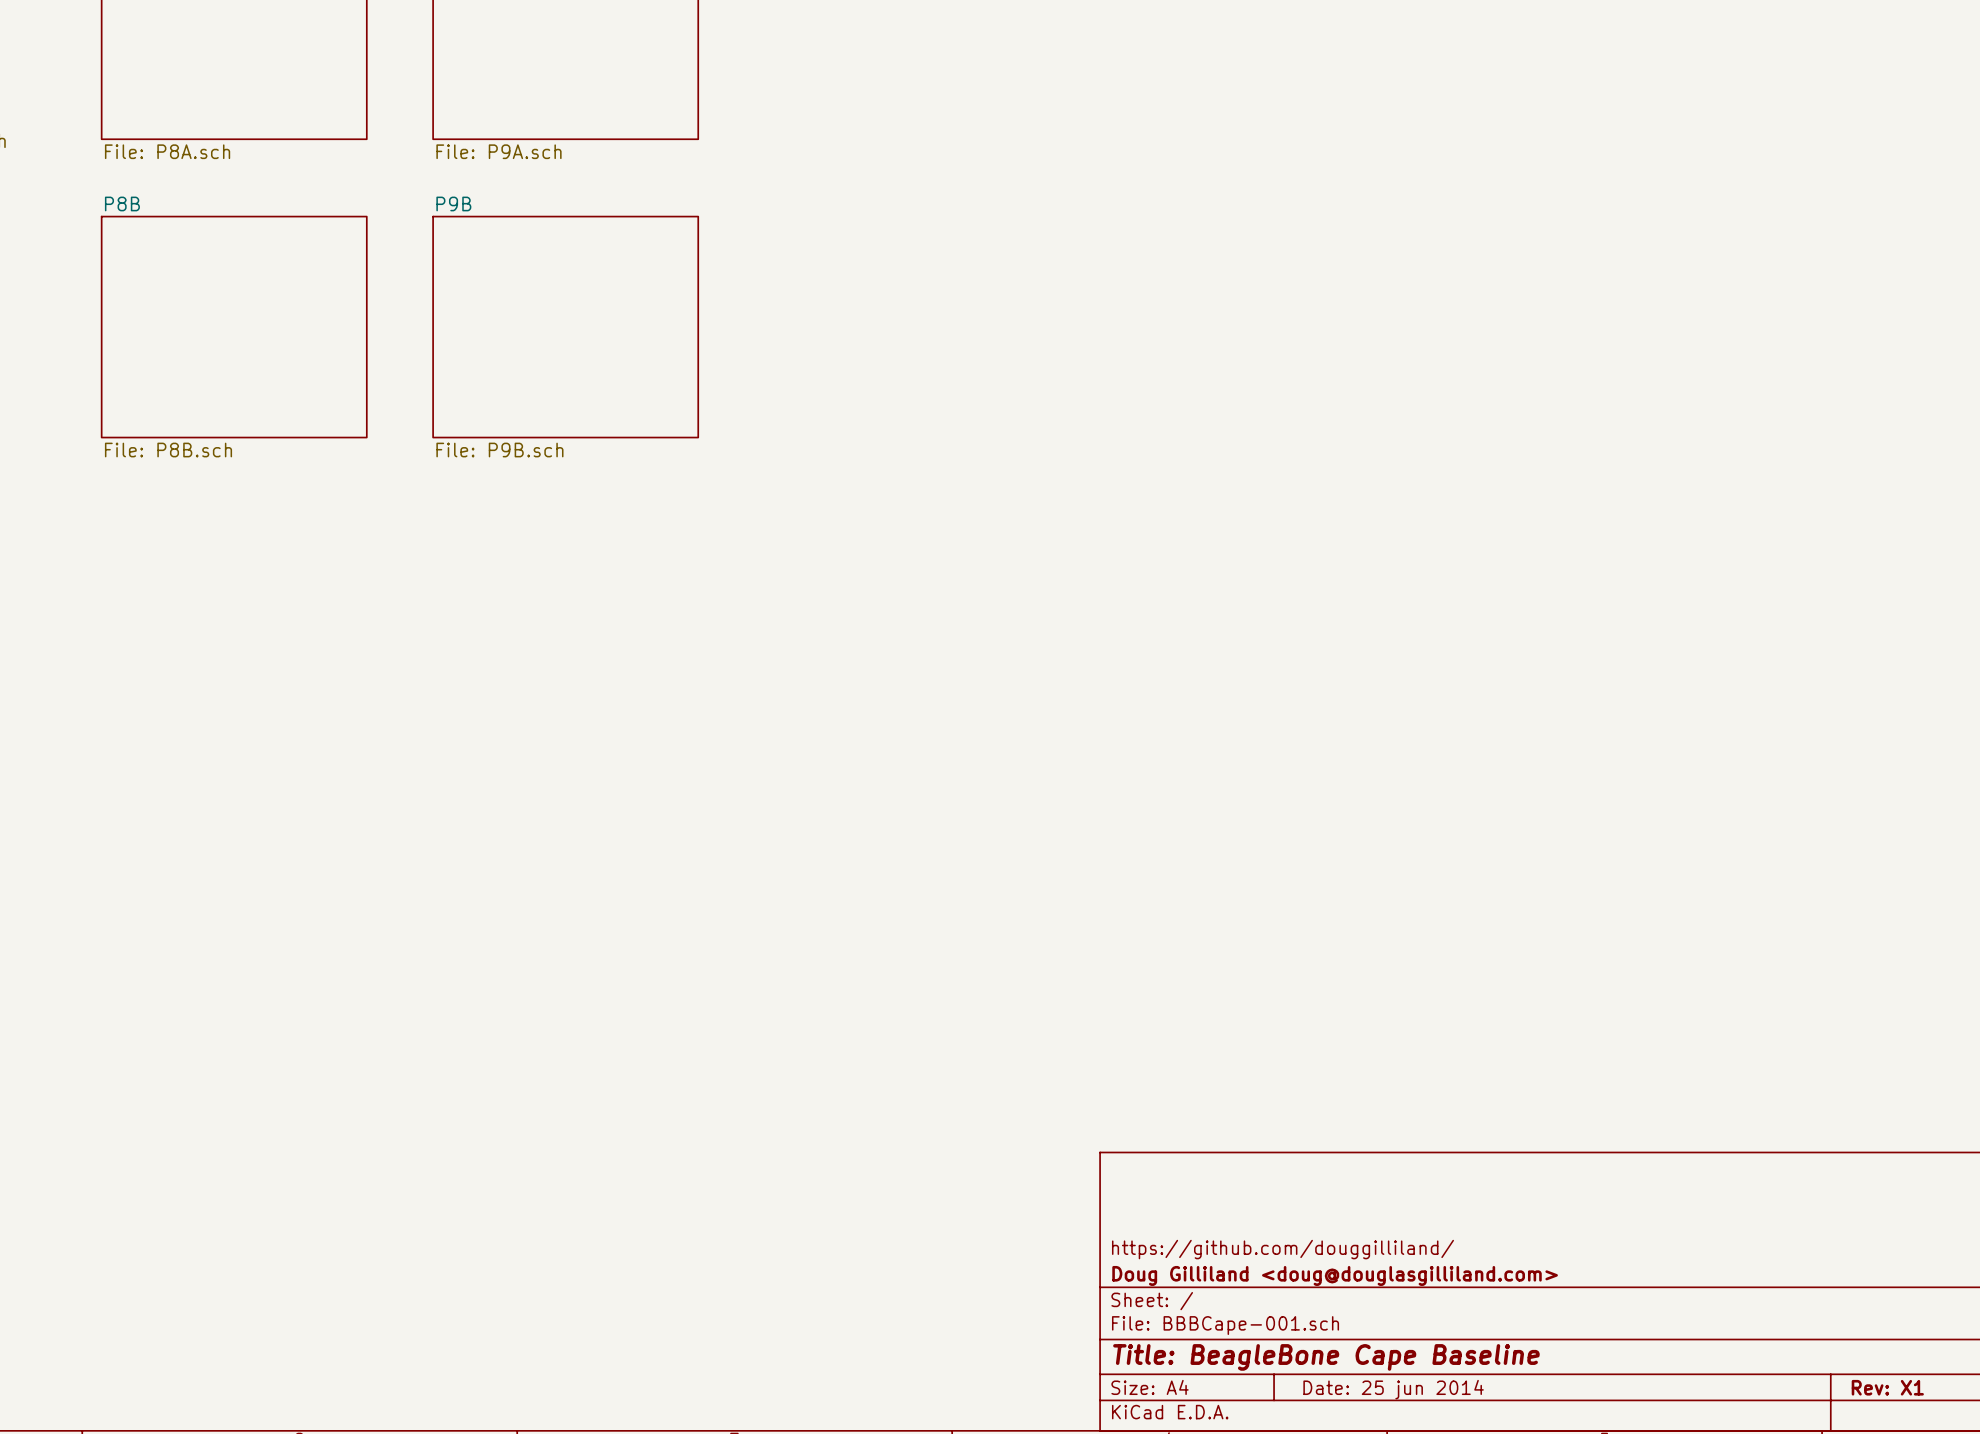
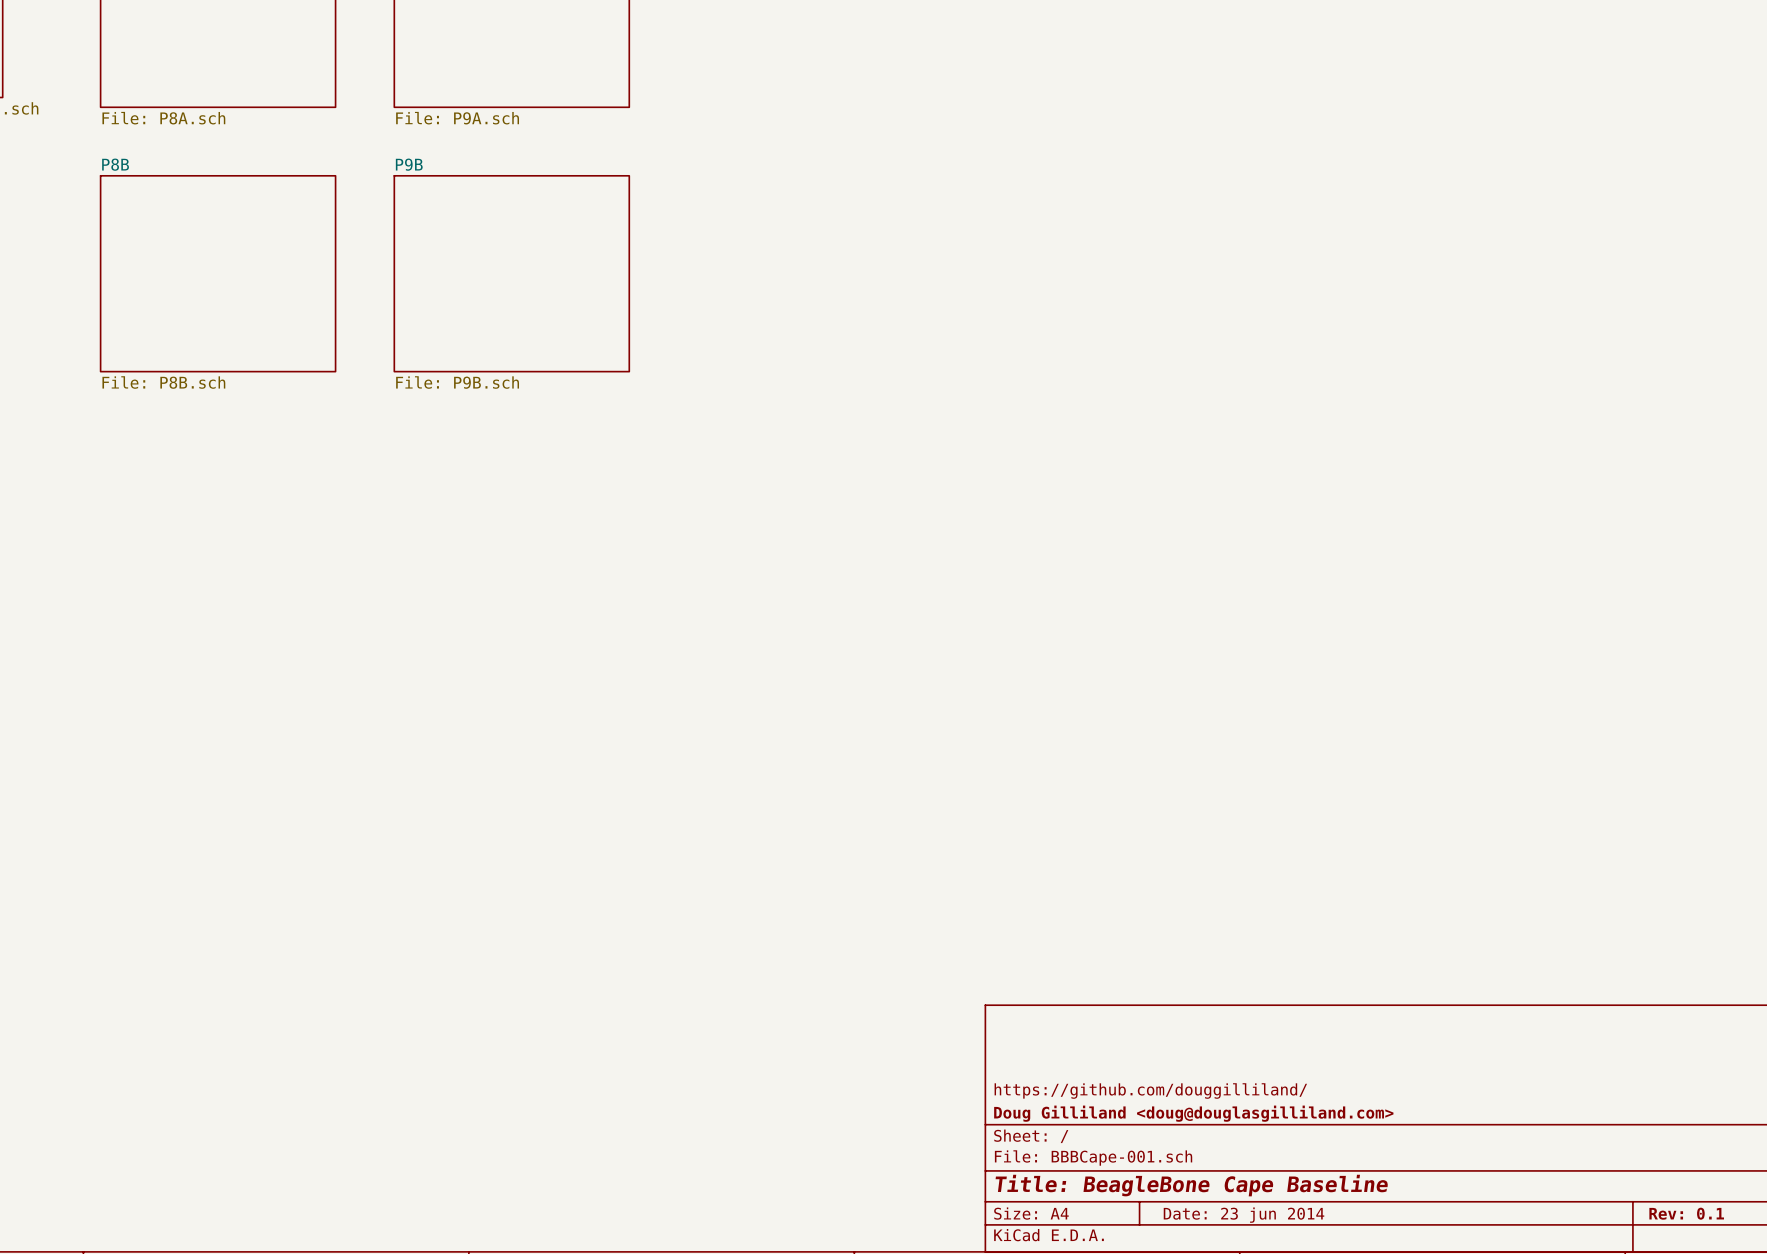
title block: Rev: X1 (1887, 1387) -> Rev: 0.1 (1686, 1213)
title block: Date: 25 jun 2014 (1393, 1389) -> Date: 23 jun 2014 (1244, 1215)

